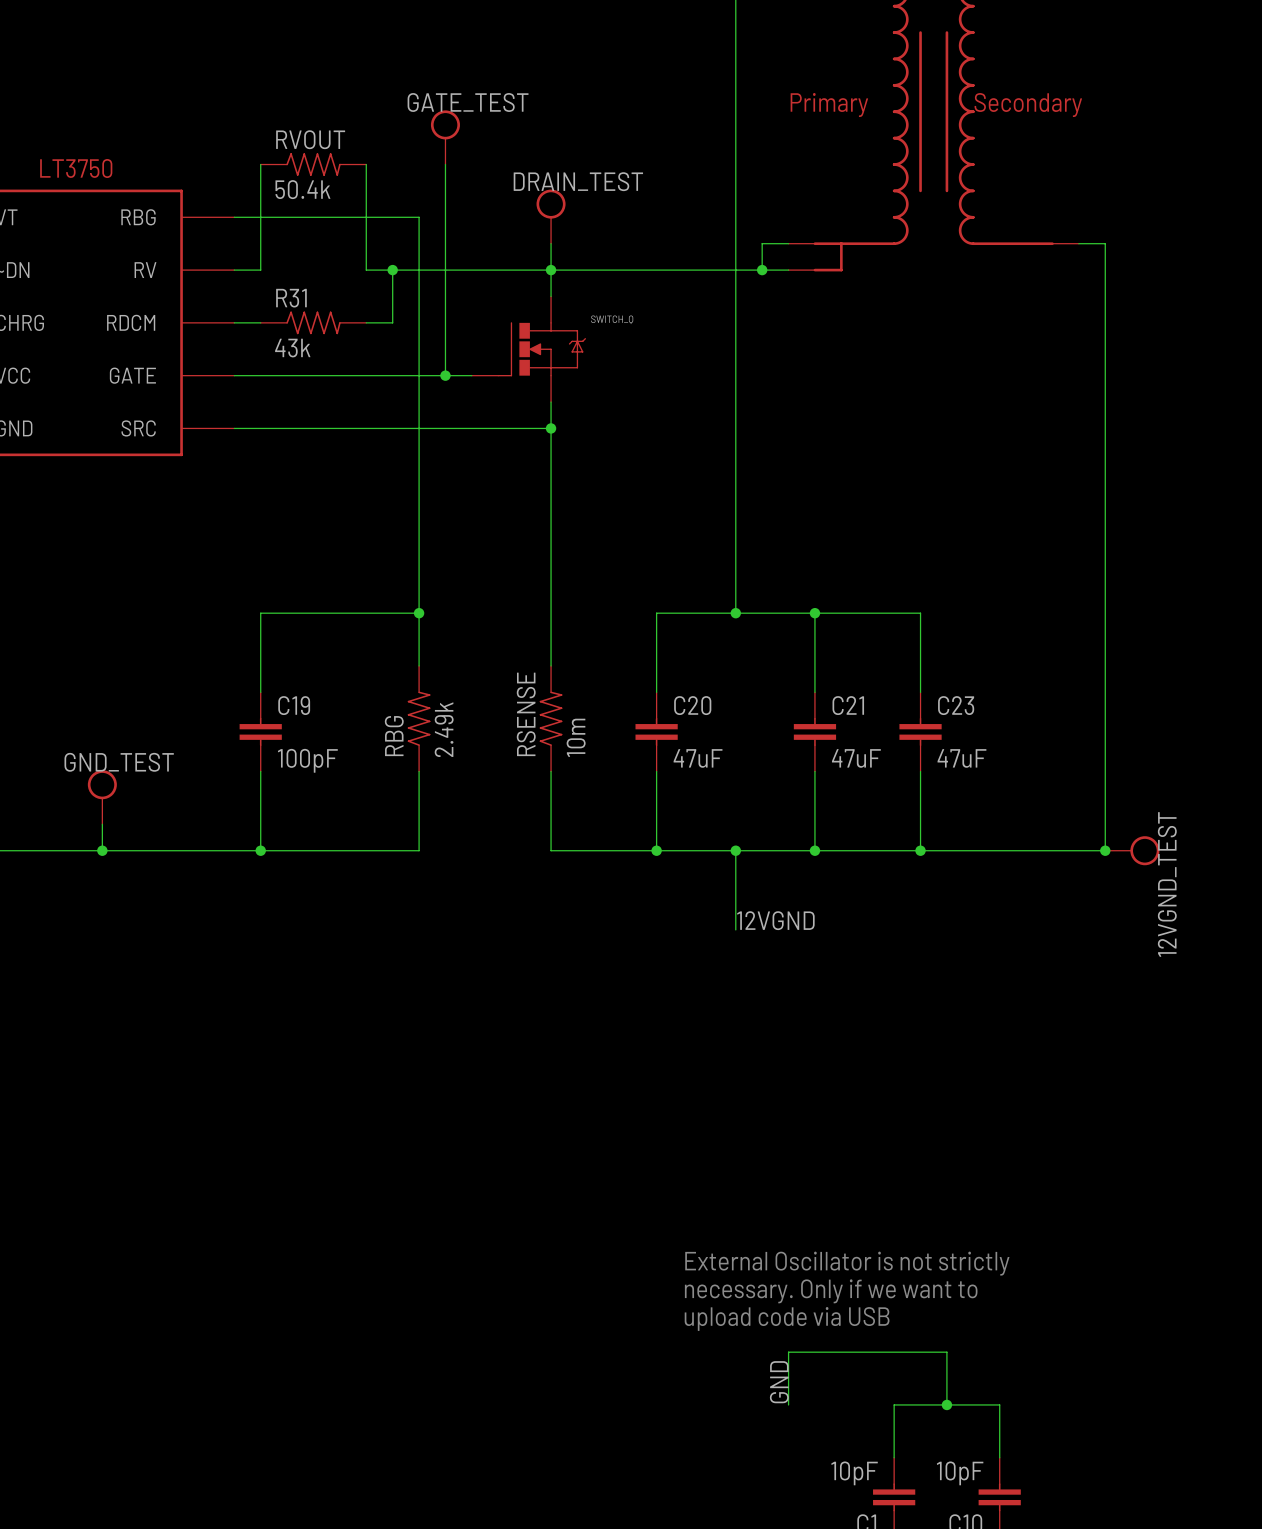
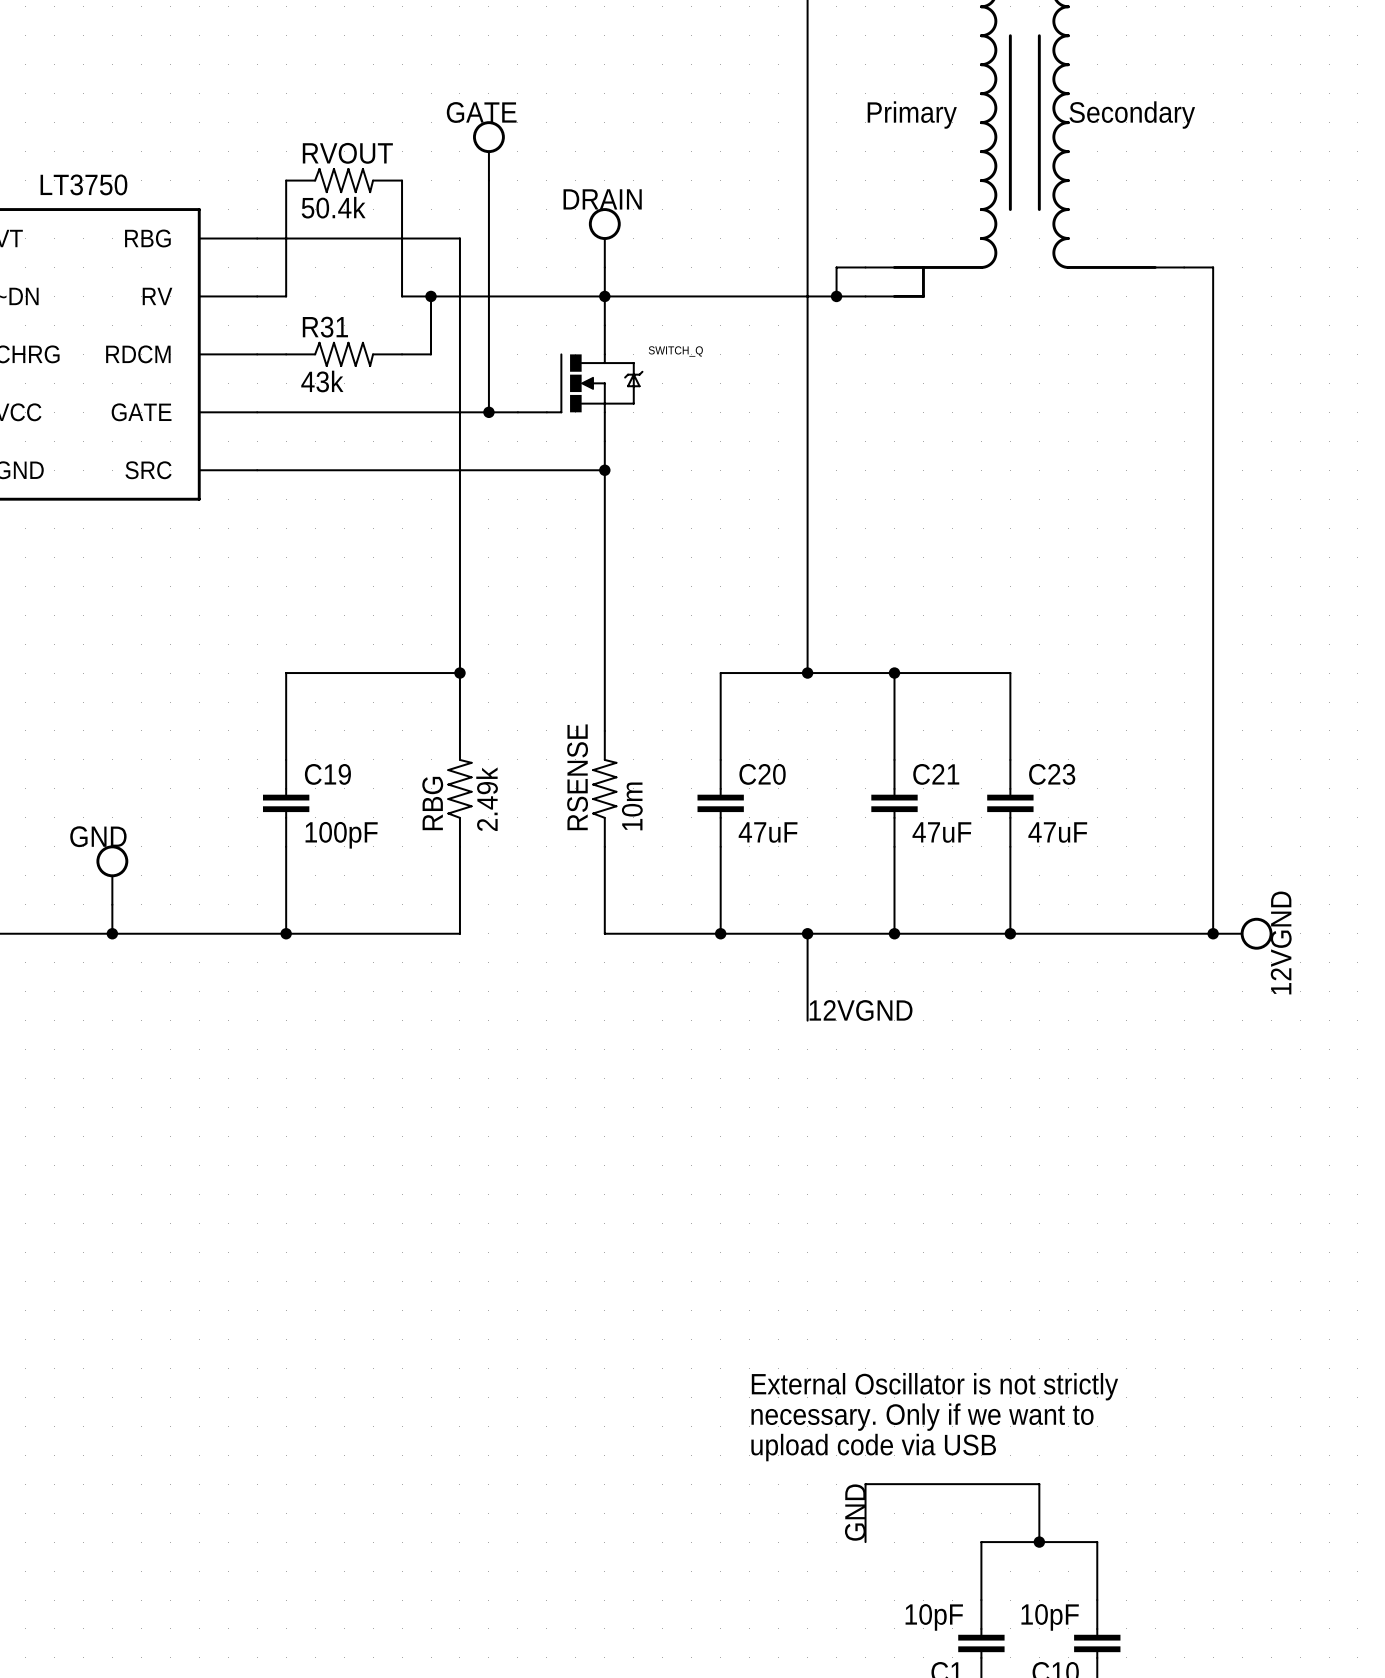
GATE_TEST name: GATE_TEST (468, 102) -> GATE (481, 112)
DRAIN_TEST name: DRAIN_TEST (578, 181) -> DRAIN (602, 199)
GND_TEST name: GND_TEST (119, 762) -> GND (98, 836)
12VGND_TEST name: 12VGND_TEST (1167, 884) -> 12VGND (1281, 942)

